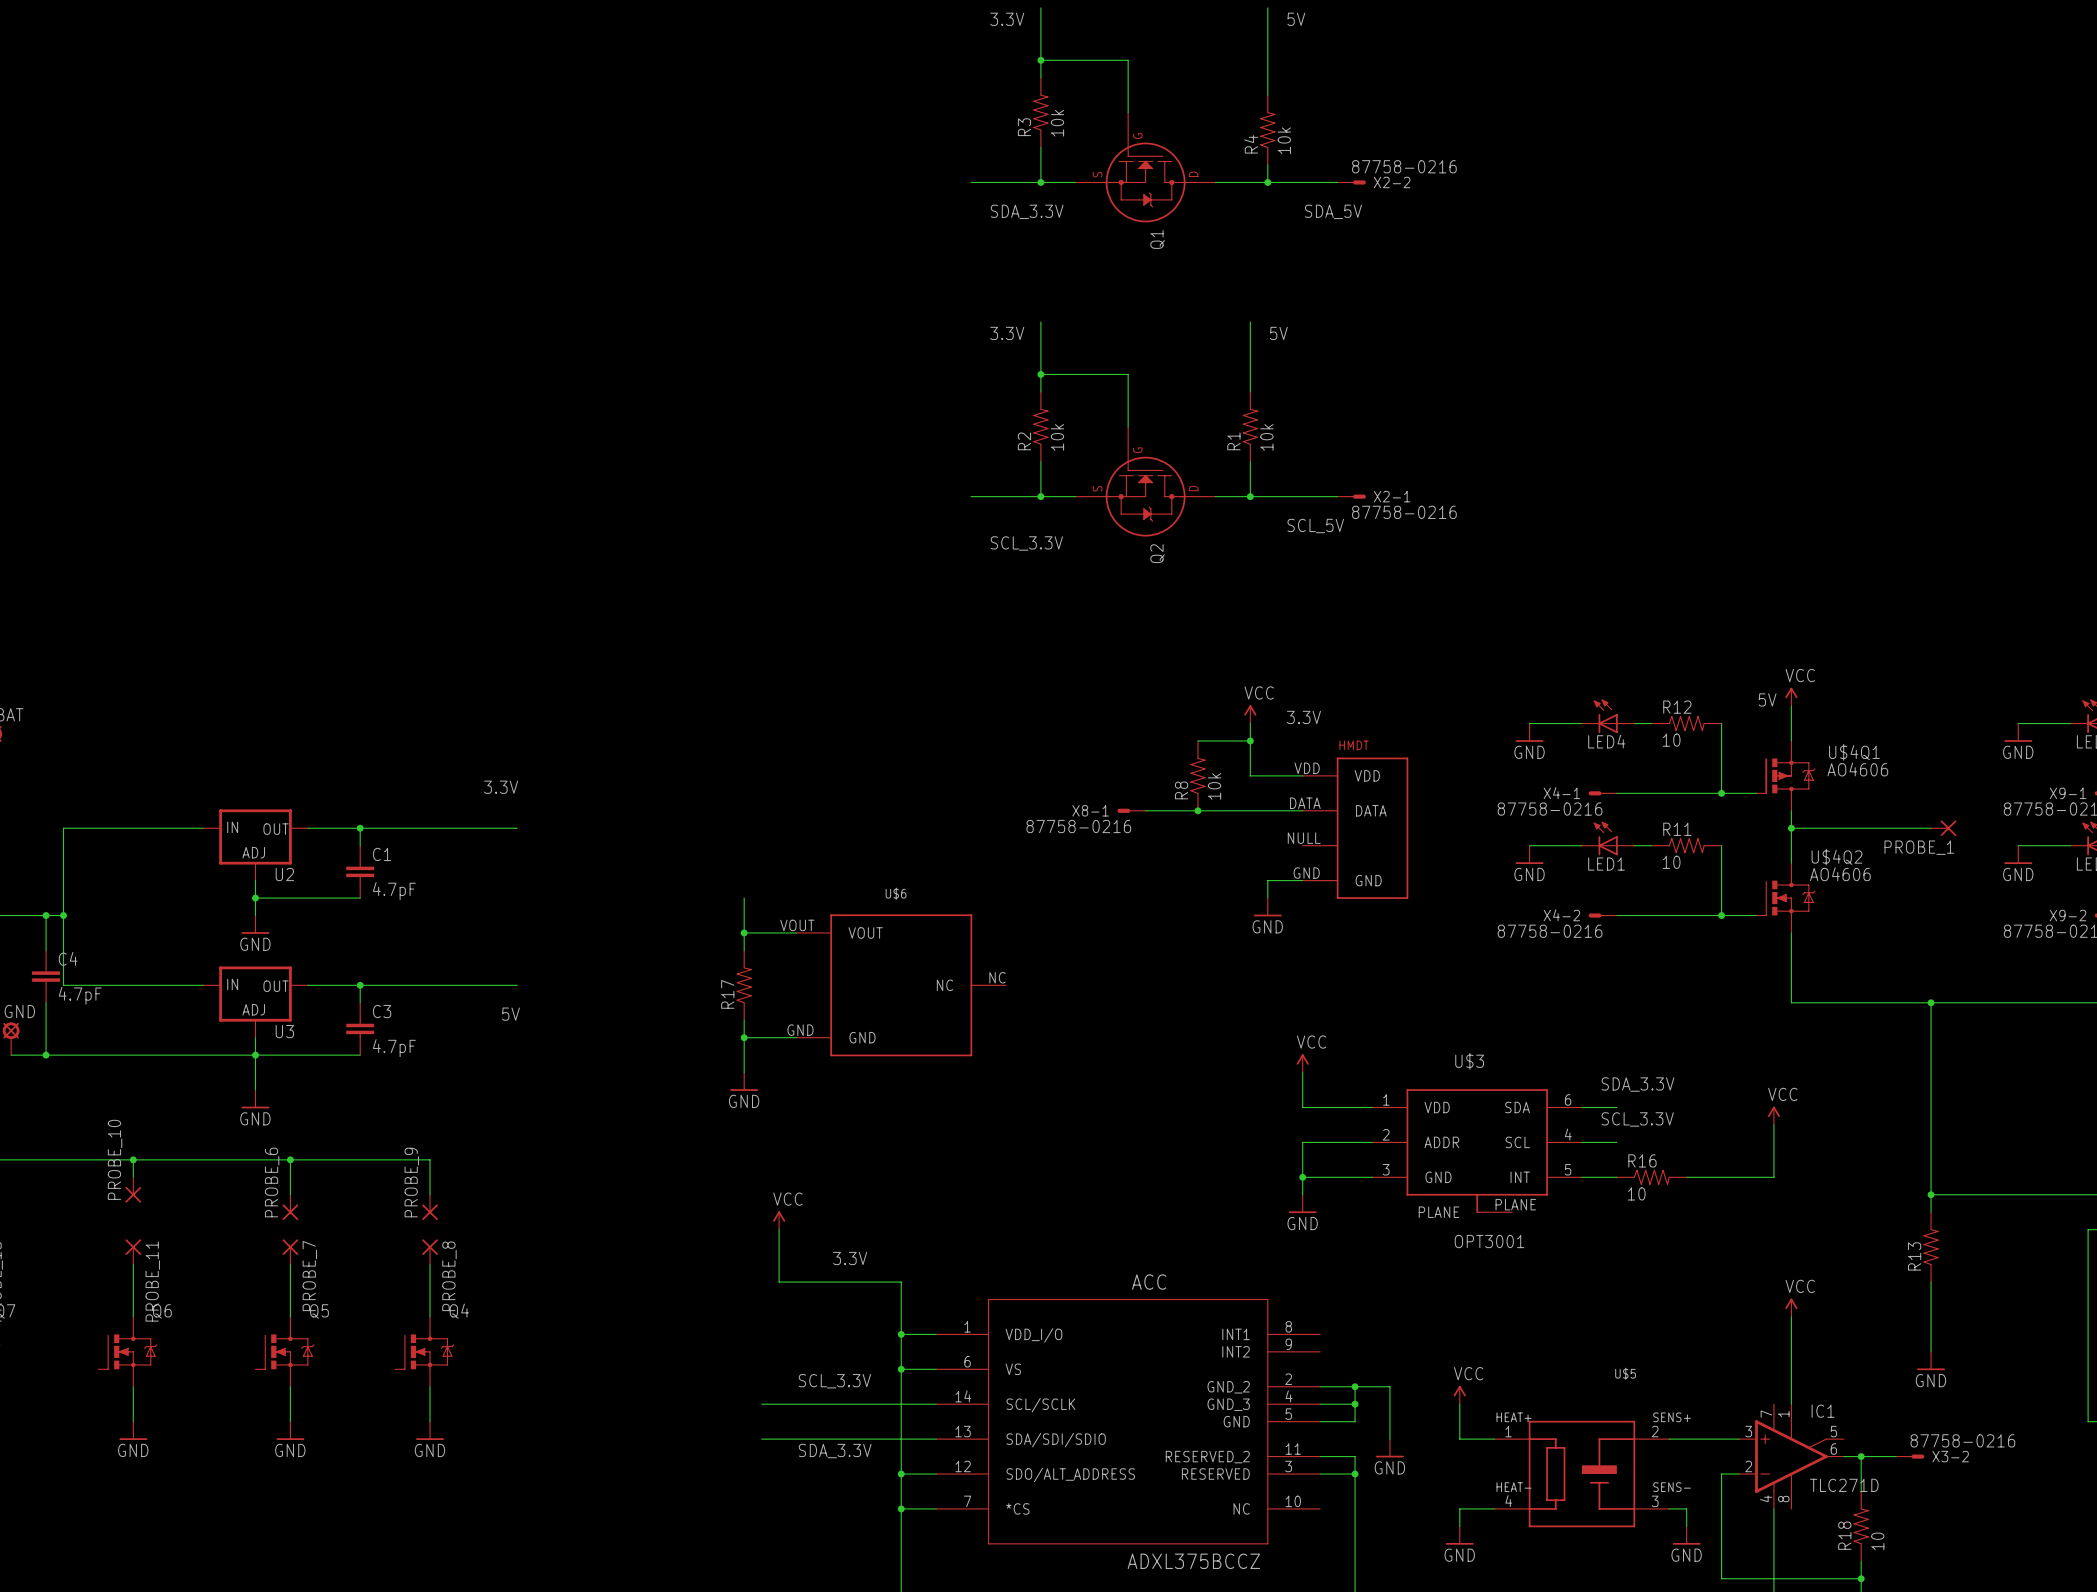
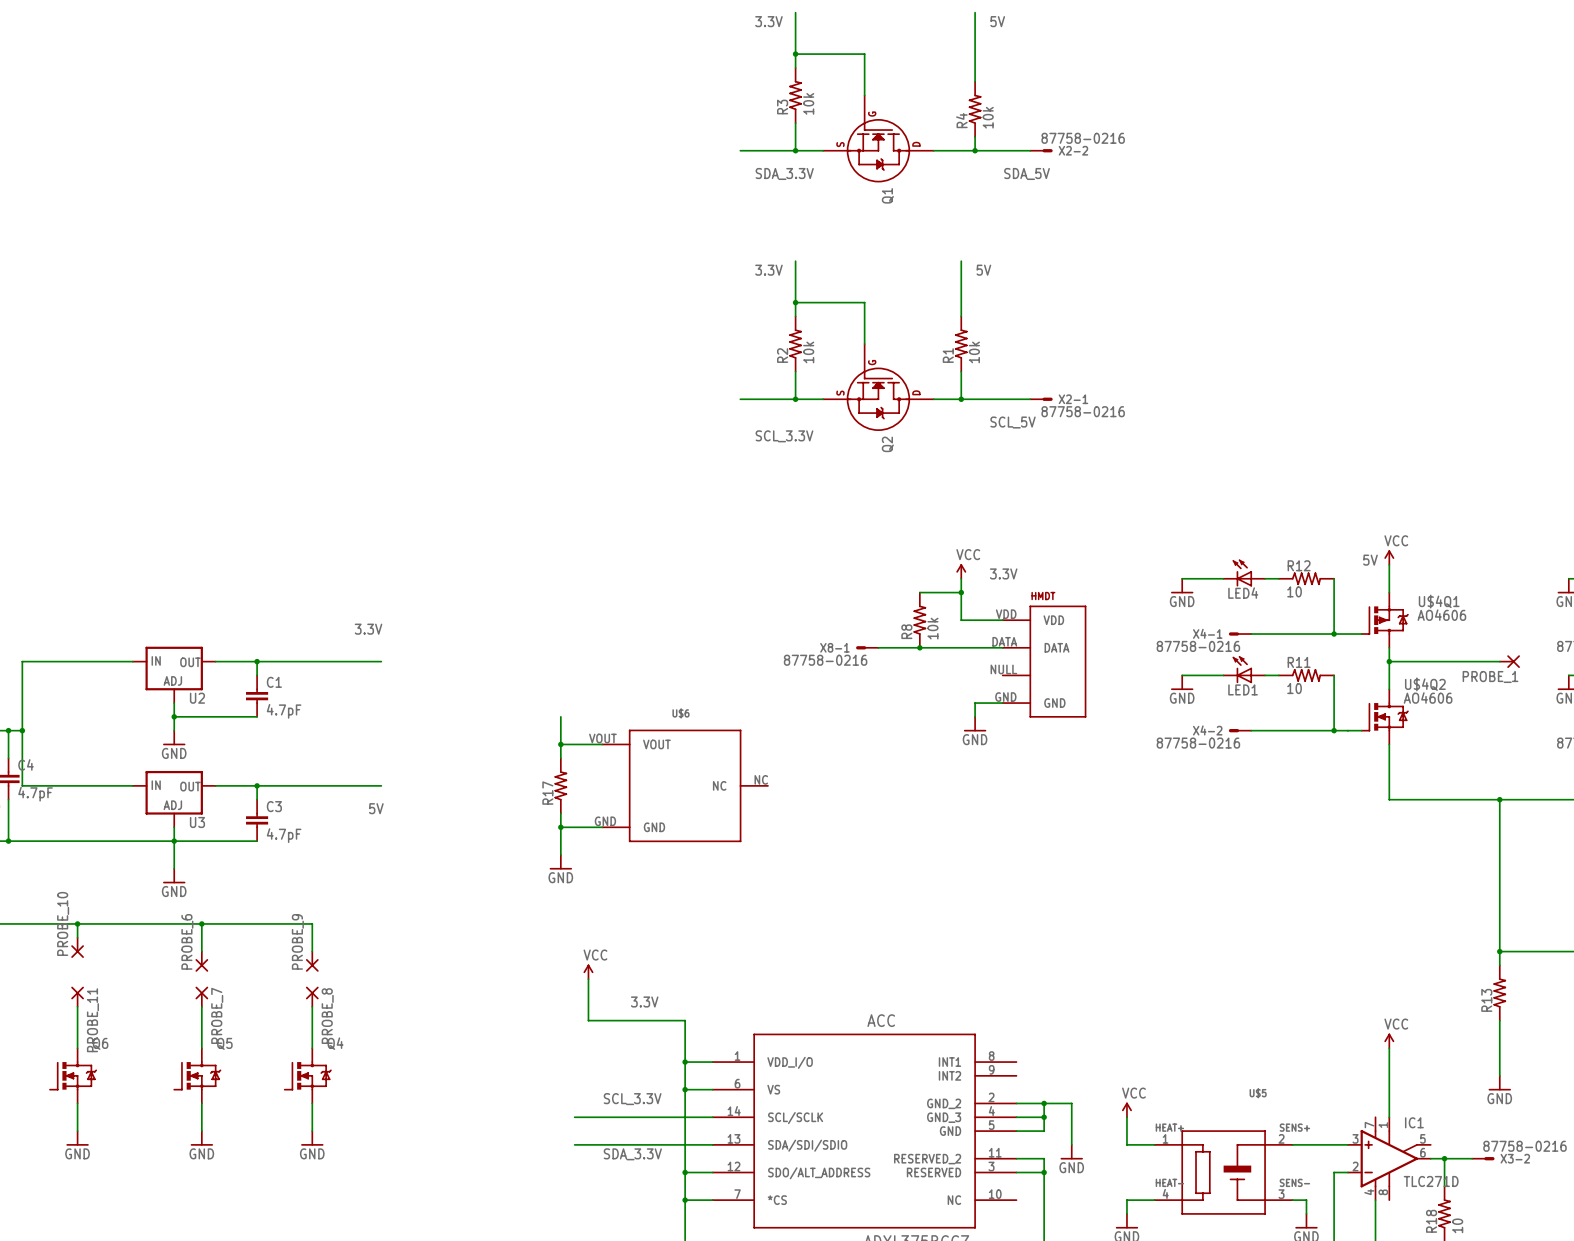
power symbol: VCC (1302, 1063) -> none
wire: (1302, 1072) (1302, 1107) (1372, 1107) -> none
label: SDA_3.3V (1638, 1084) -> none
wire: (1581, 1107) (1616, 1107) -> none
power symbol: VCC (1773, 1115) -> none
label: SCL_3.3V (1637, 1119) -> none
wire: (1773, 1124) (1773, 1177) (1686, 1177) -> none
wire: (1372, 1142) (1302, 1142) (1302, 1194) -> none
wire: (1581, 1142) (1616, 1142) -> none
U$3: OPT3001 (1477, 1151) -> none
wire: (1302, 1177) (1372, 1177) -> none
junction: (1302, 1177) -> none
wire: (1581, 1177) (1616, 1177) -> none
R16: 10 (1651, 1177) -> none
power symbol: GND (1302, 1203) -> none

